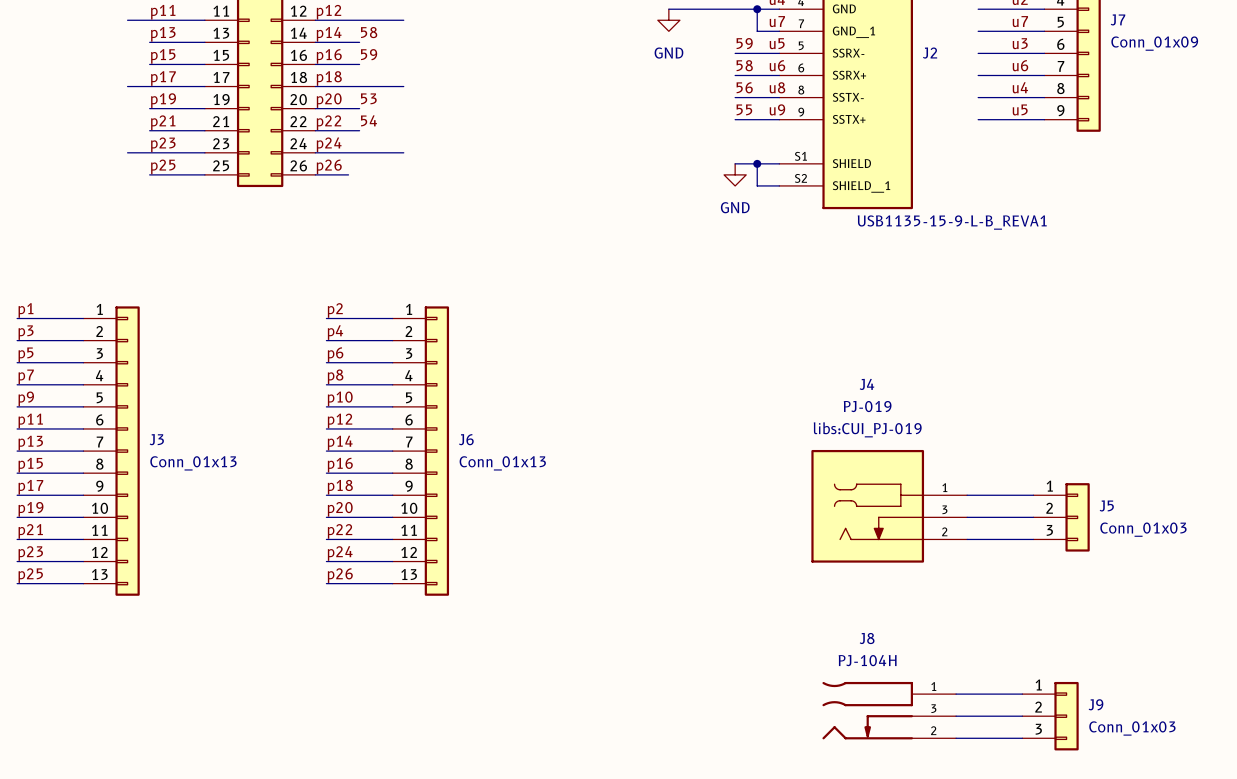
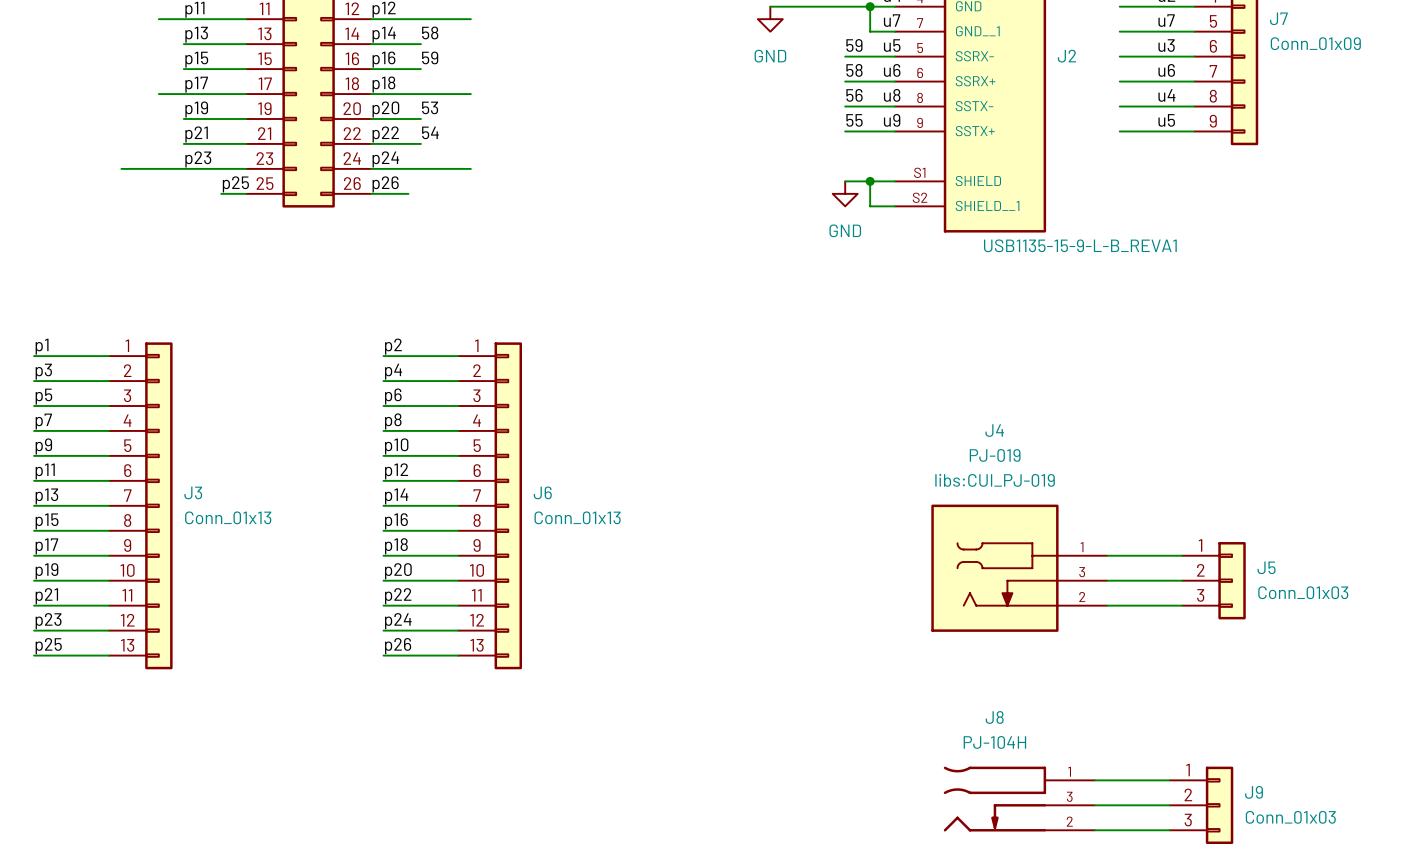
label position: p25 (163, 166) -> p25 (235, 184)
wire: (149, 174) (182, 174) -> (121, 168) (158, 168)

